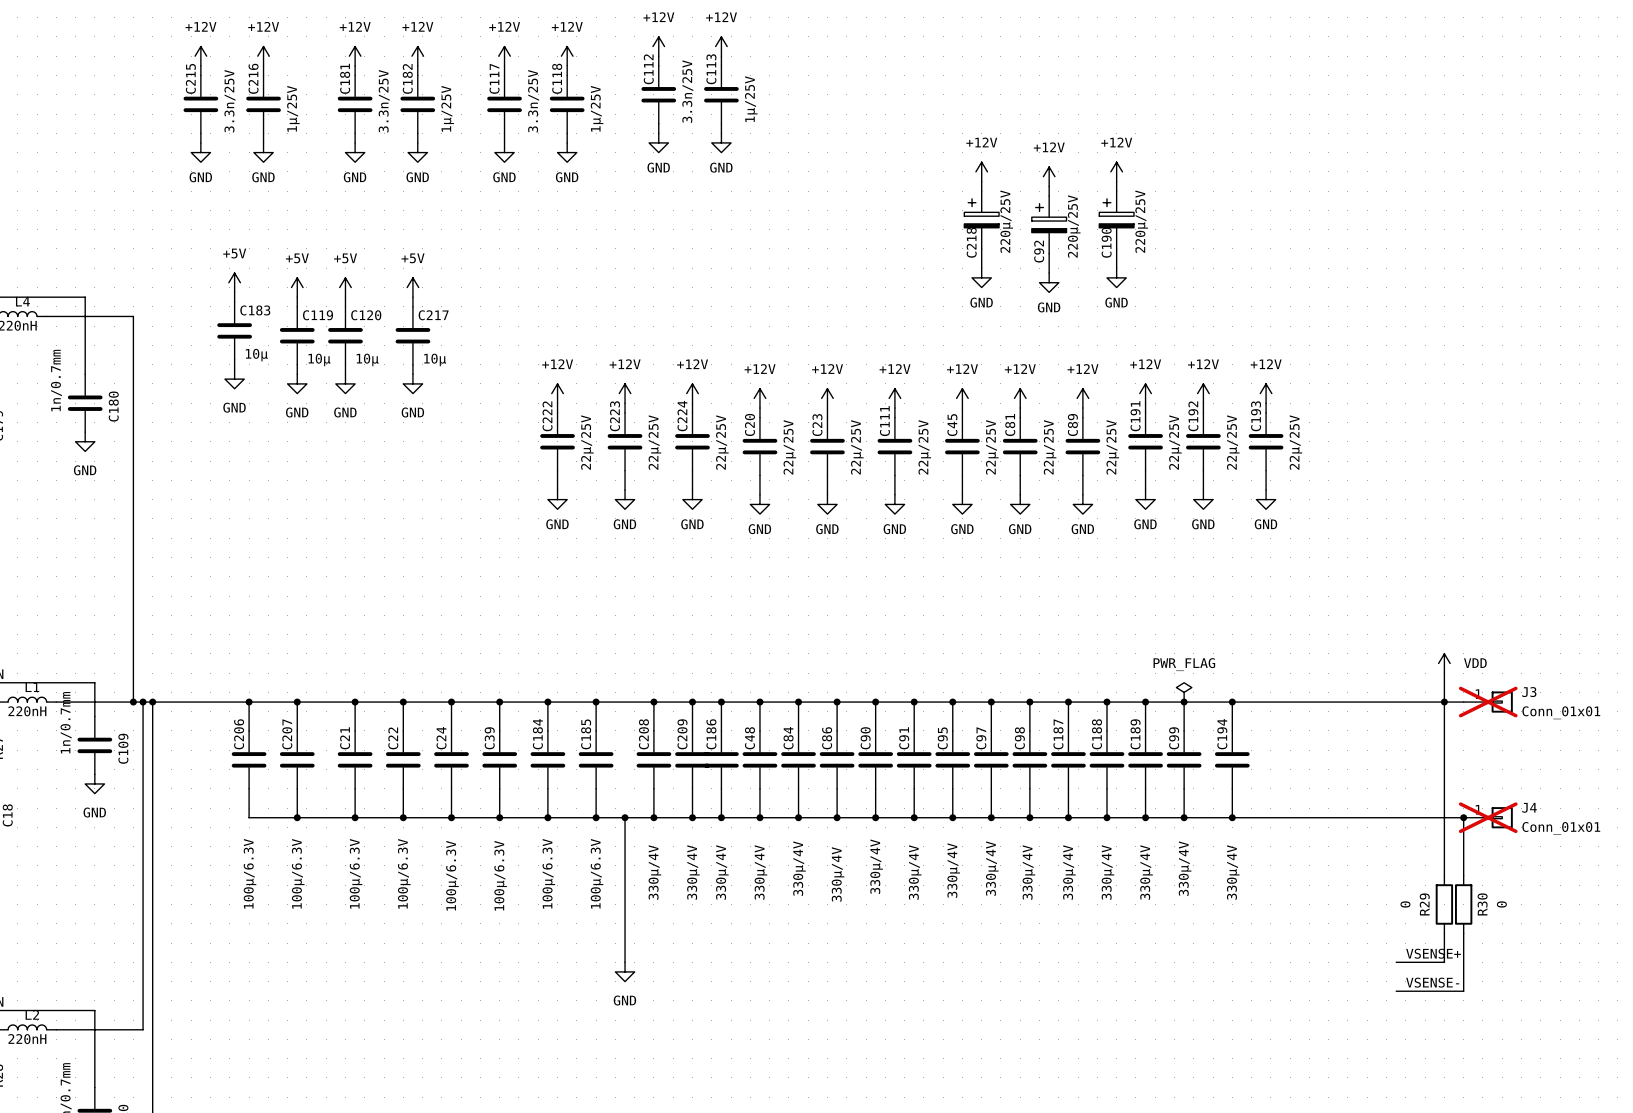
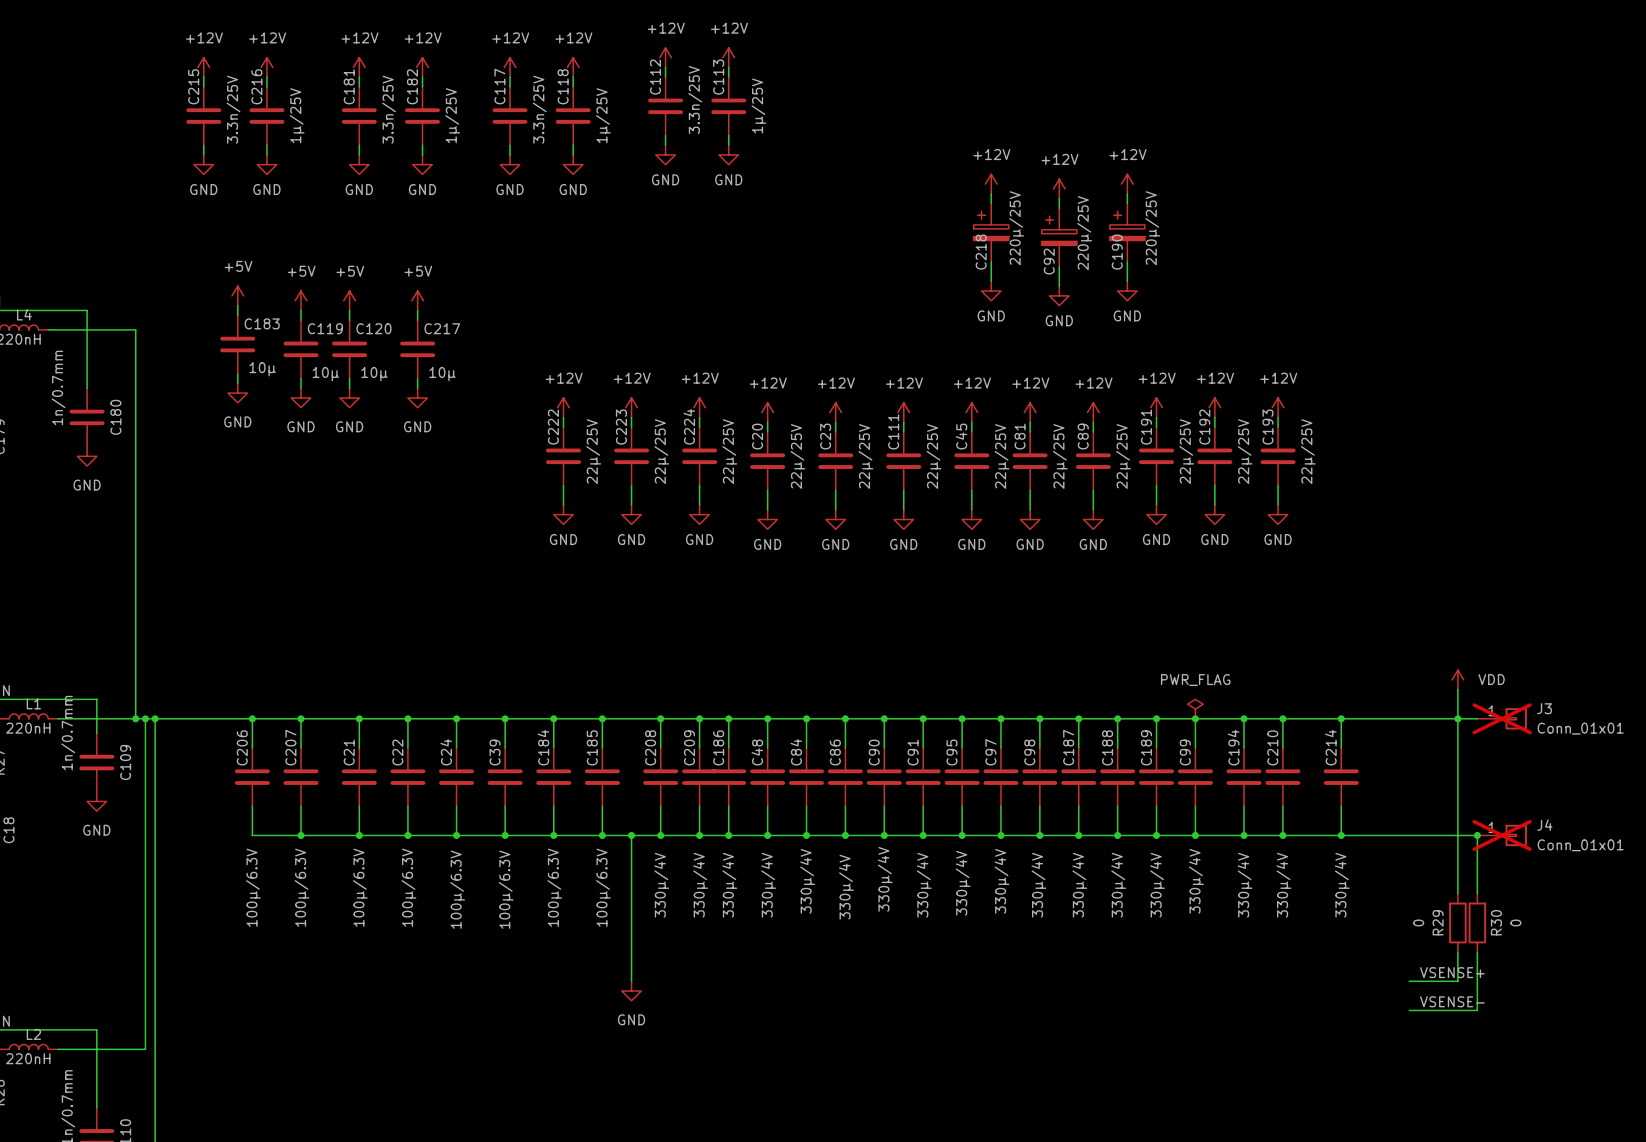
wire: none -> (1282, 718) (1282, 747)
junction: none -> (1282, 718)
wire: none -> (1341, 718) (1341, 747)
junction: none -> (1341, 718)
C210: none -> 330µ/4V (1282, 777)
C214: none -> 330µ/4V (1341, 777)
wire: none -> (1282, 806) (1282, 835)
wire: none -> (1341, 806) (1341, 835)
junction: none -> (1282, 835)
junction: none -> (1341, 835)

